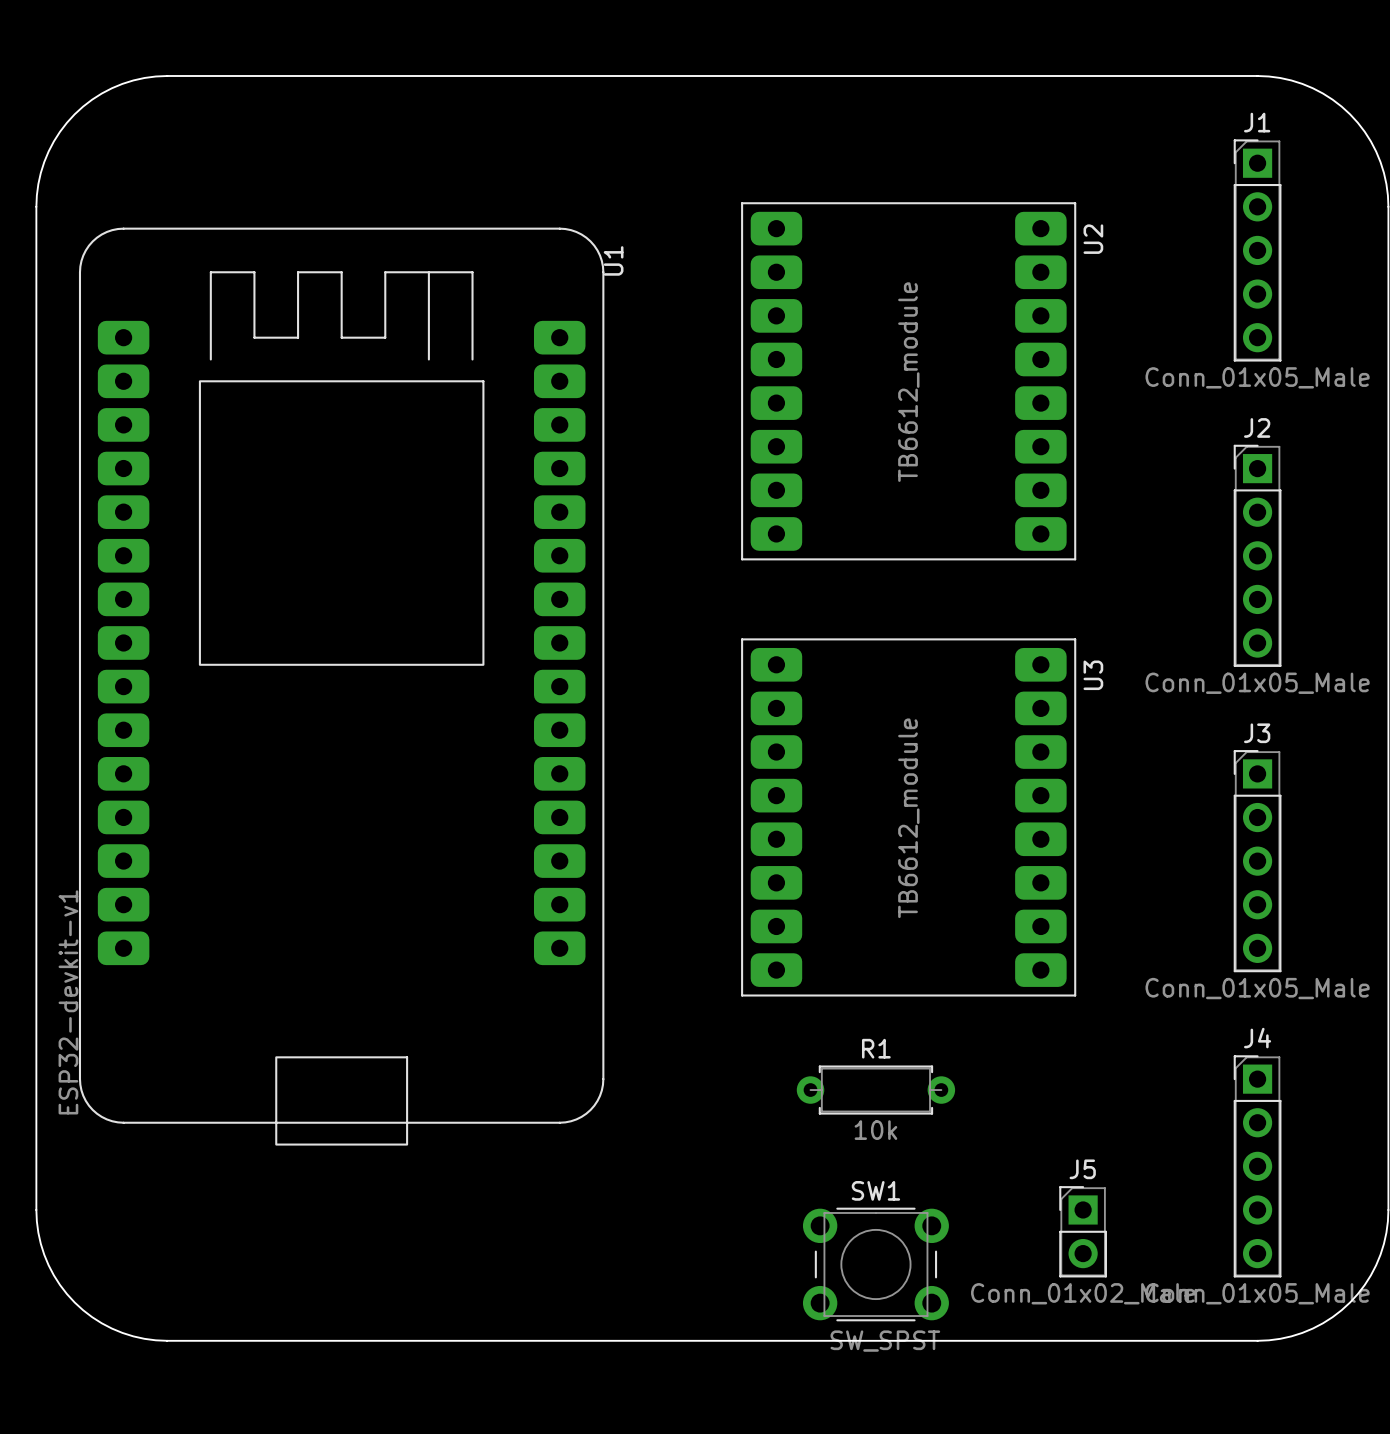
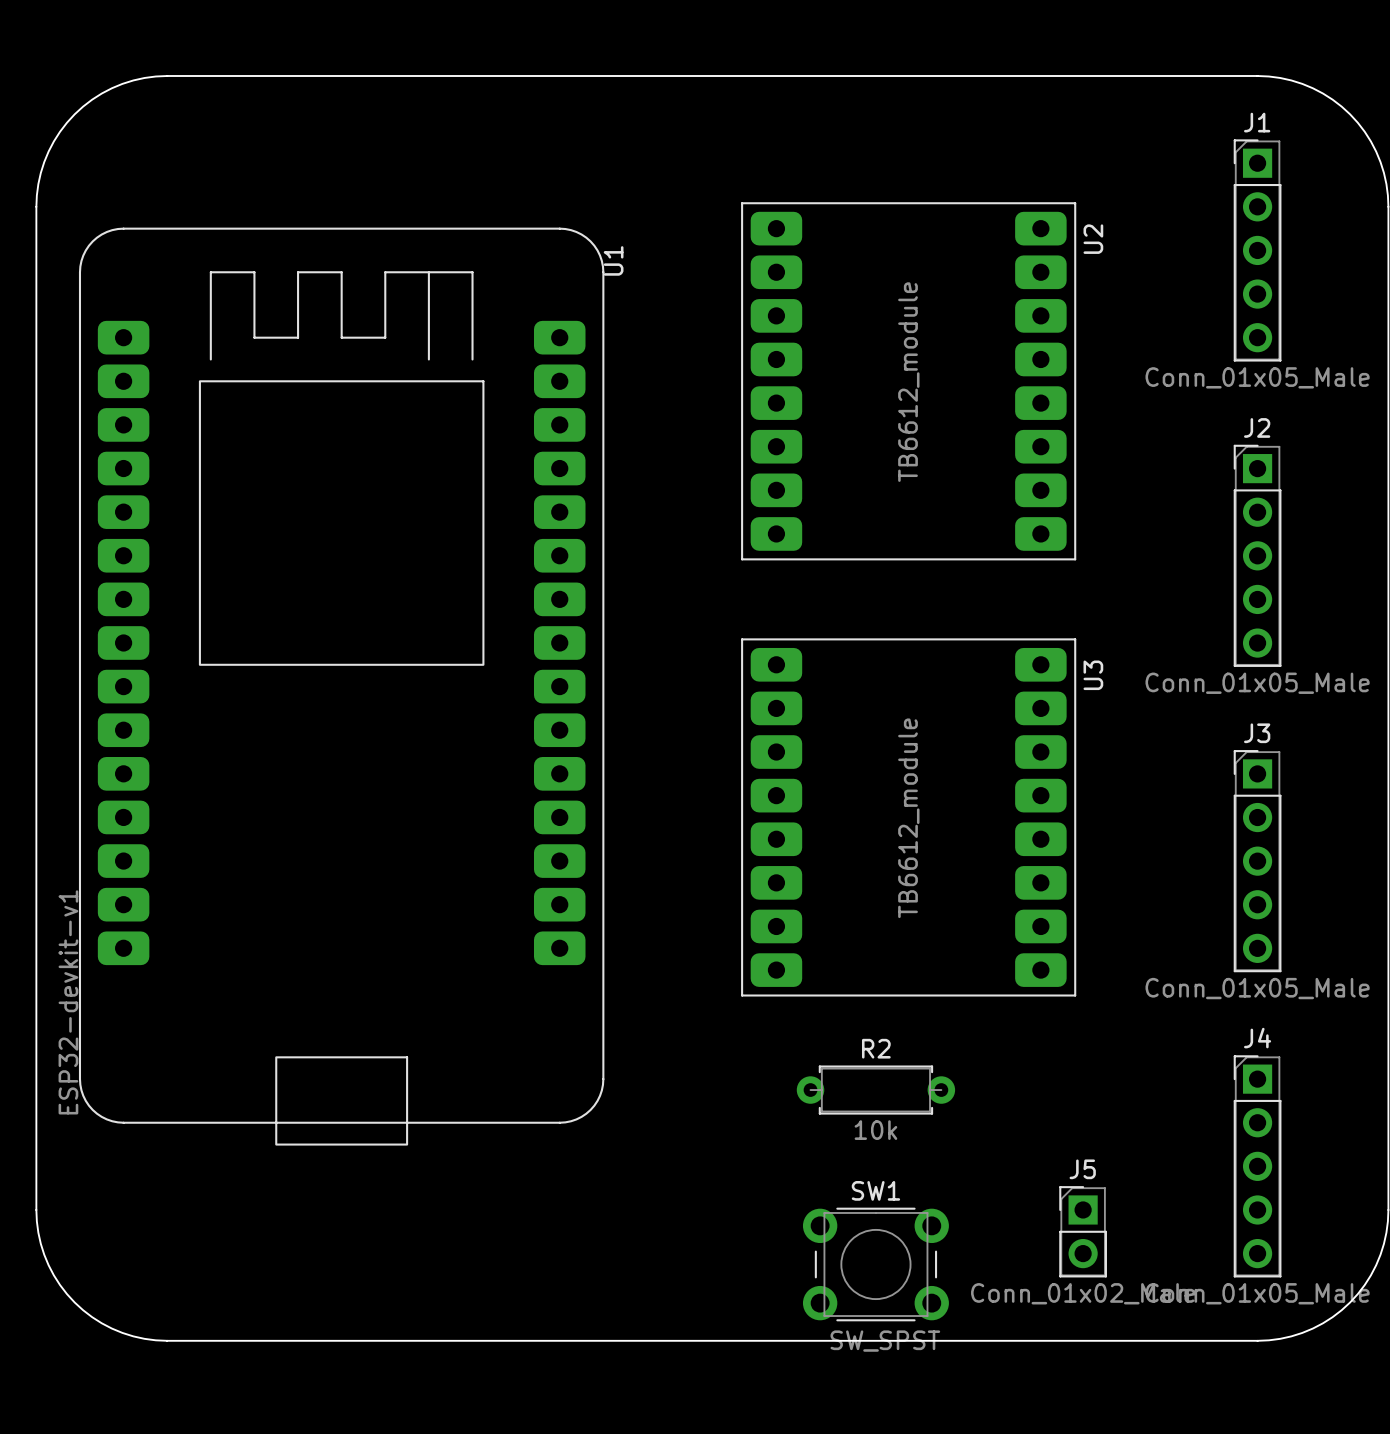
R1 name: R1 (876, 1048) -> R2 (876, 1048)

